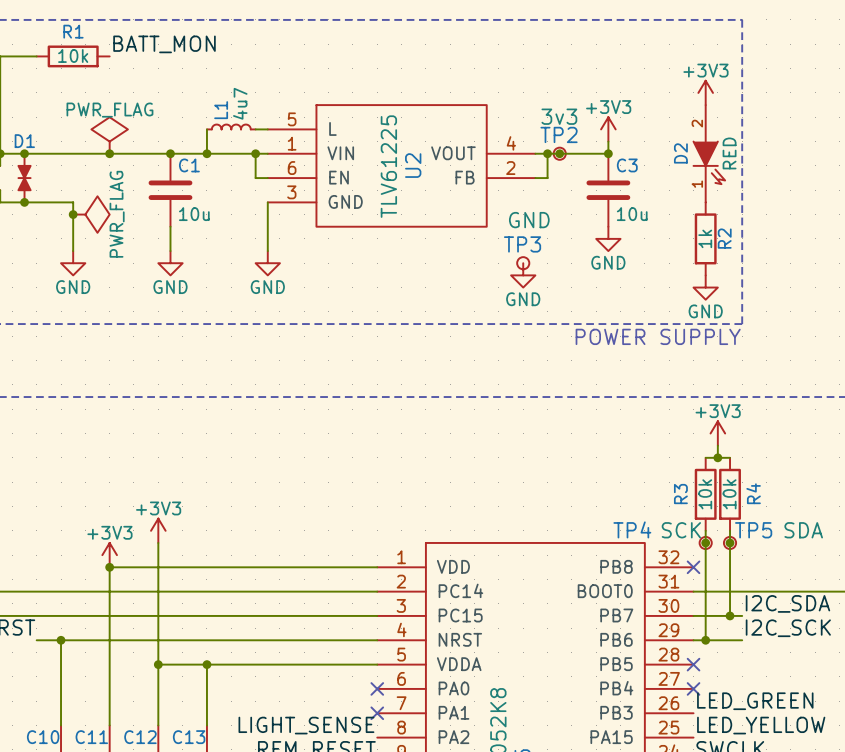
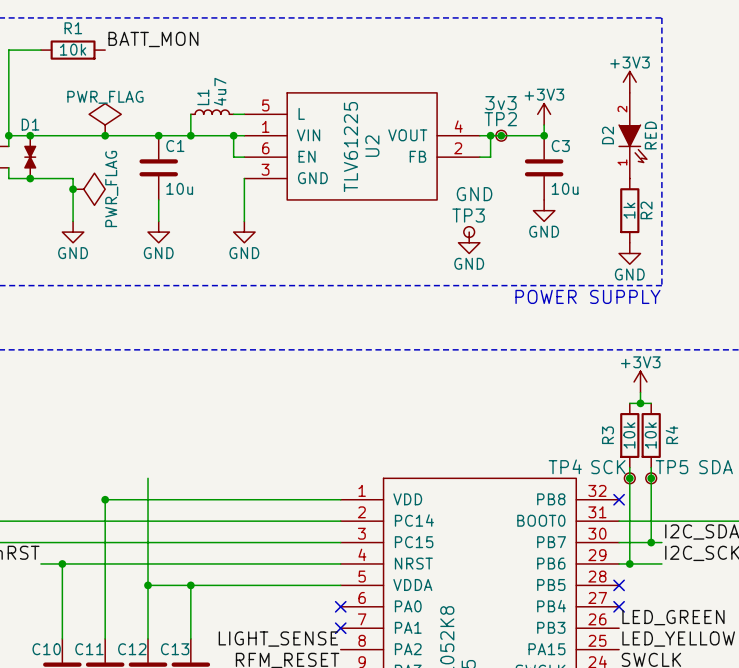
power symbol: +3V3 (158, 530) -> none
power symbol: +3V3 (109, 555) -> none

